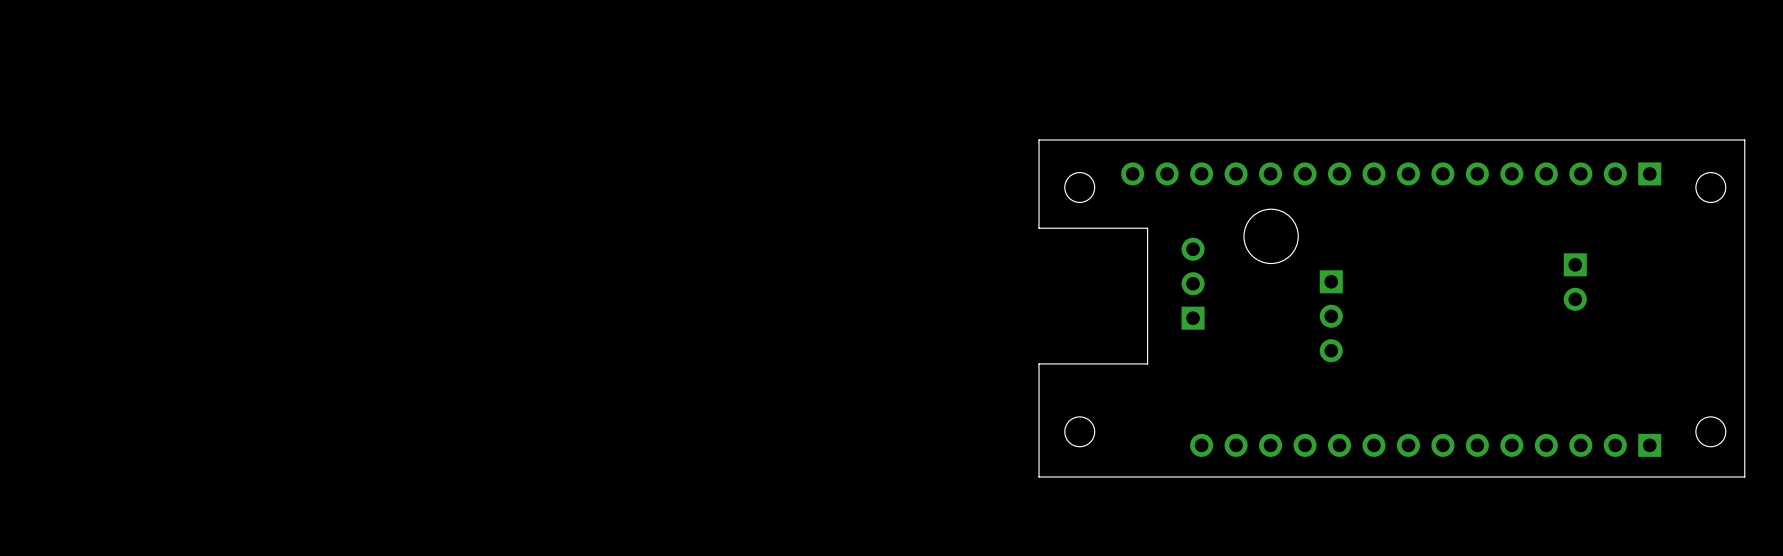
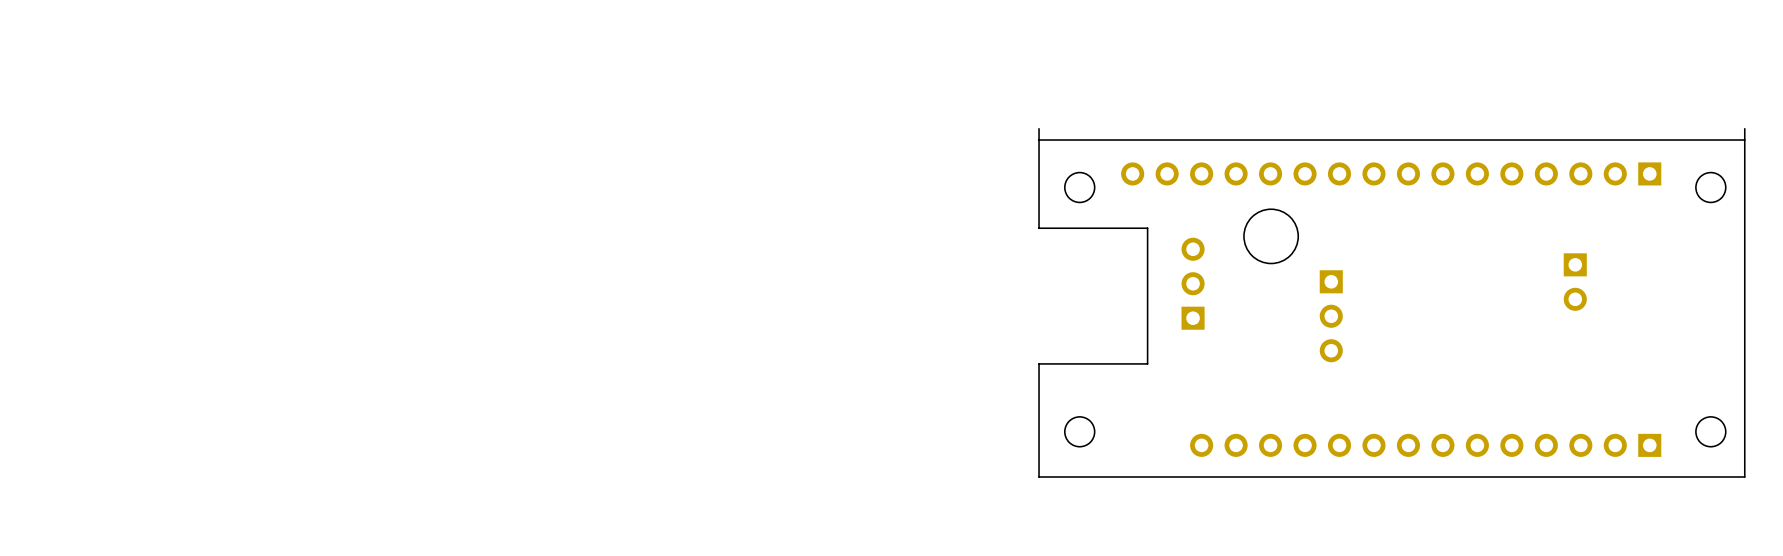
board edge: none -> (1039, 128) (1039, 140)
board edge: none -> (1744, 128) (1744, 140)

